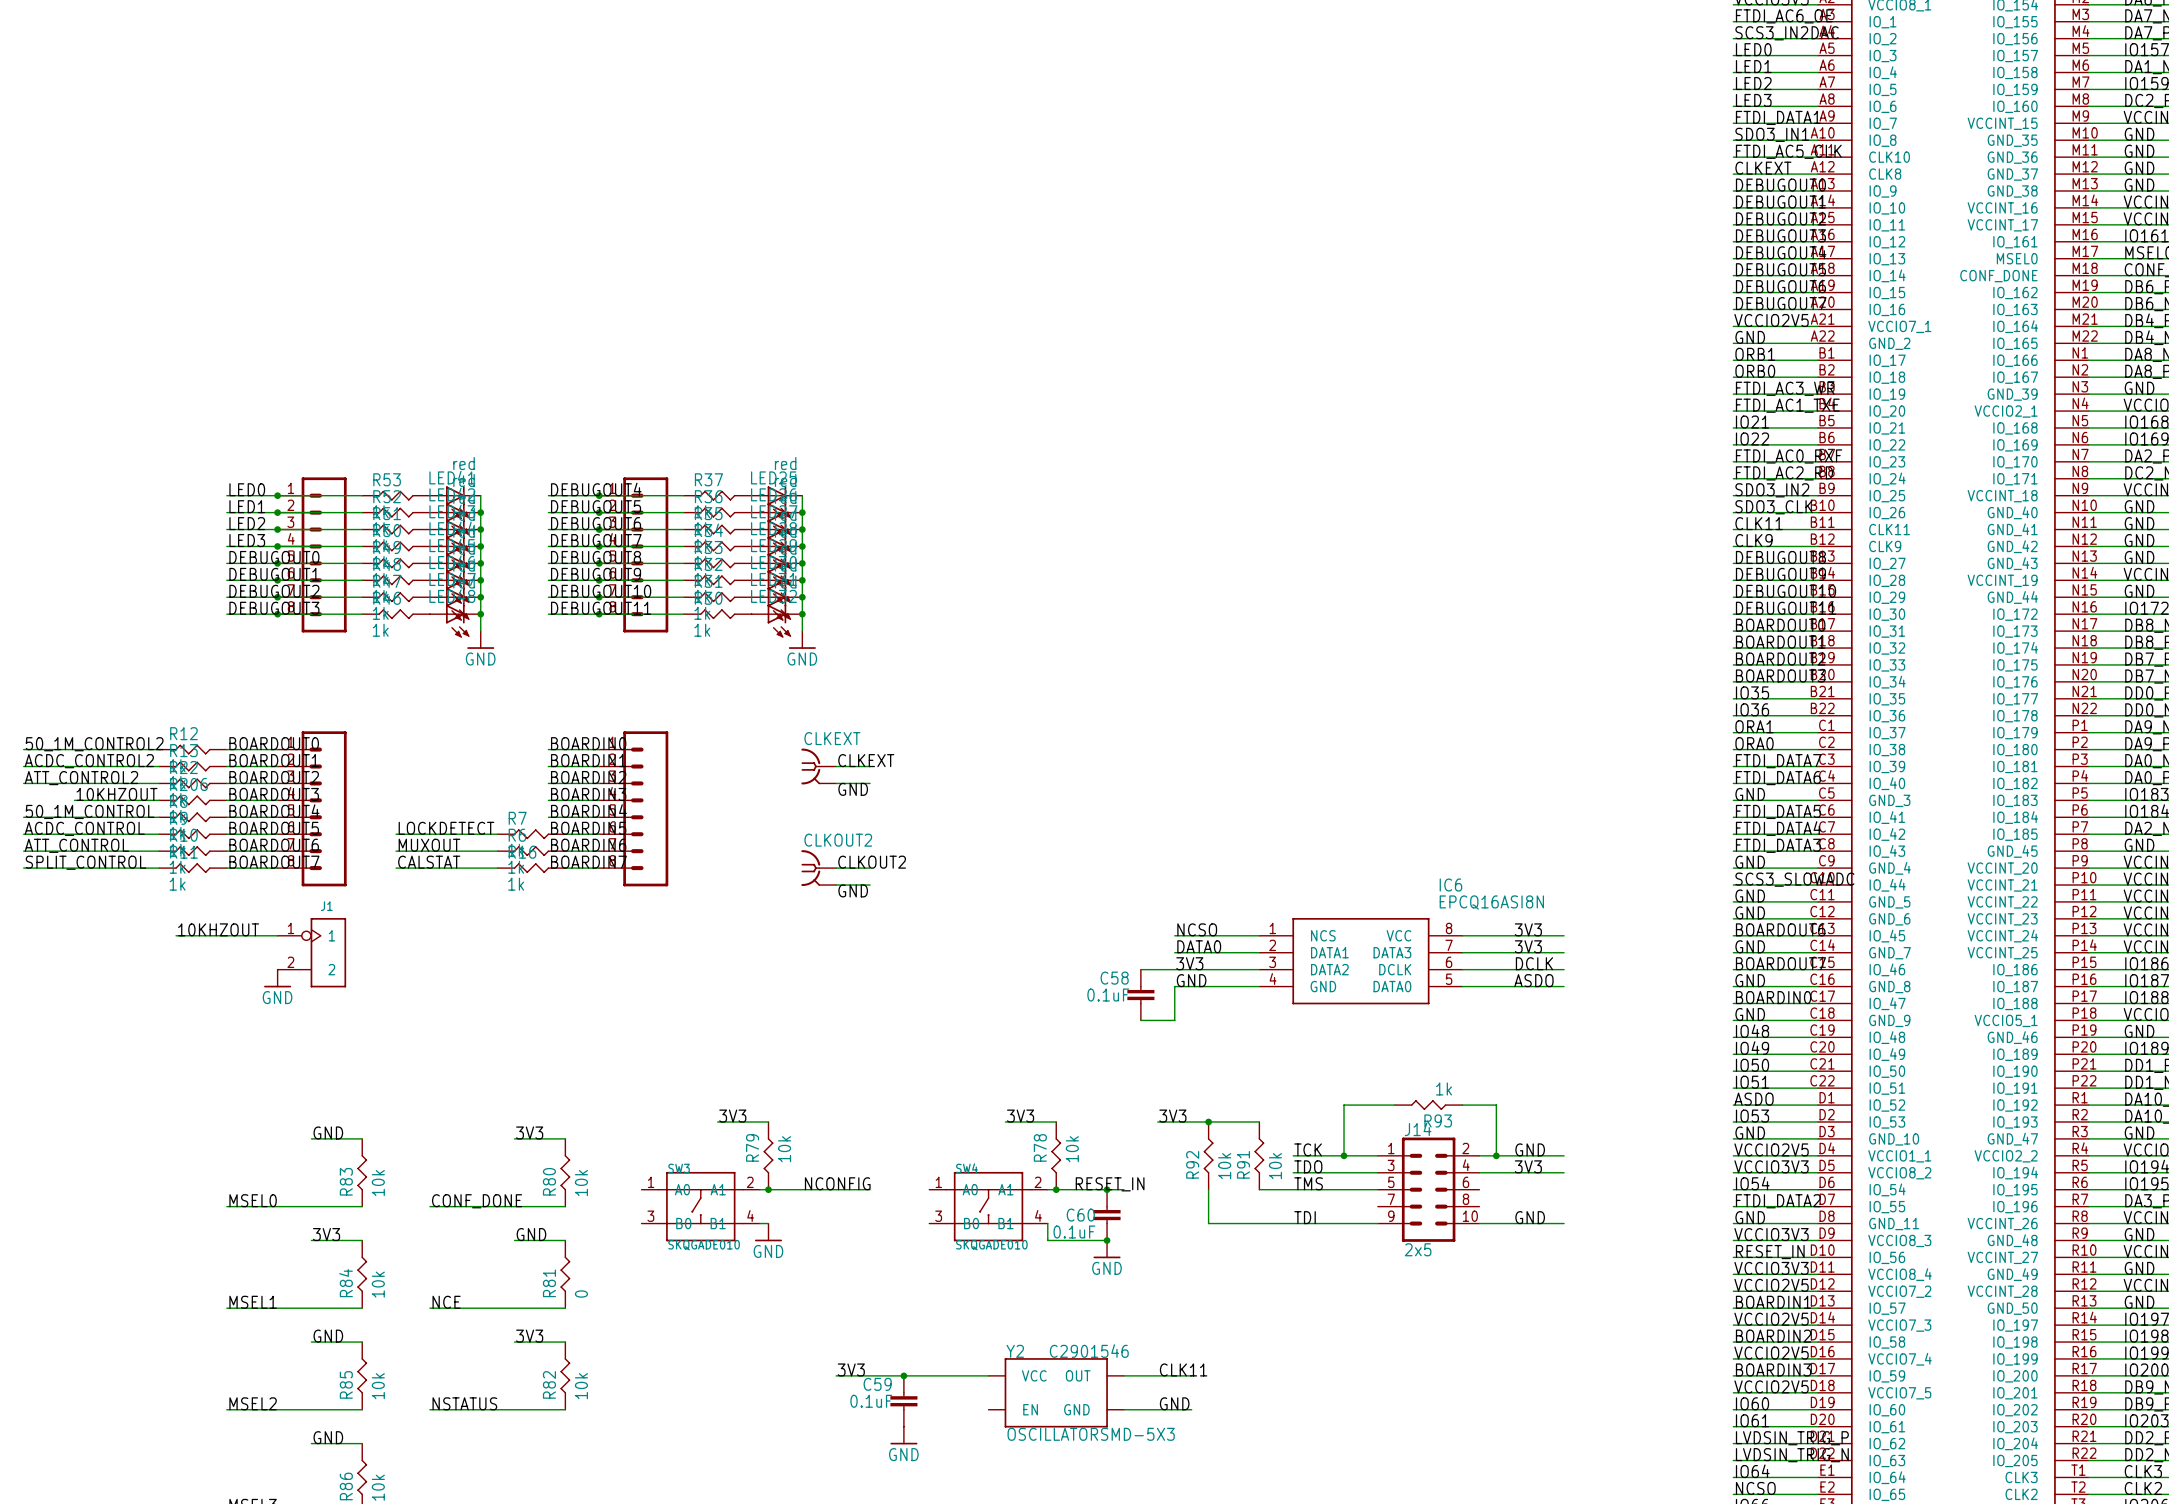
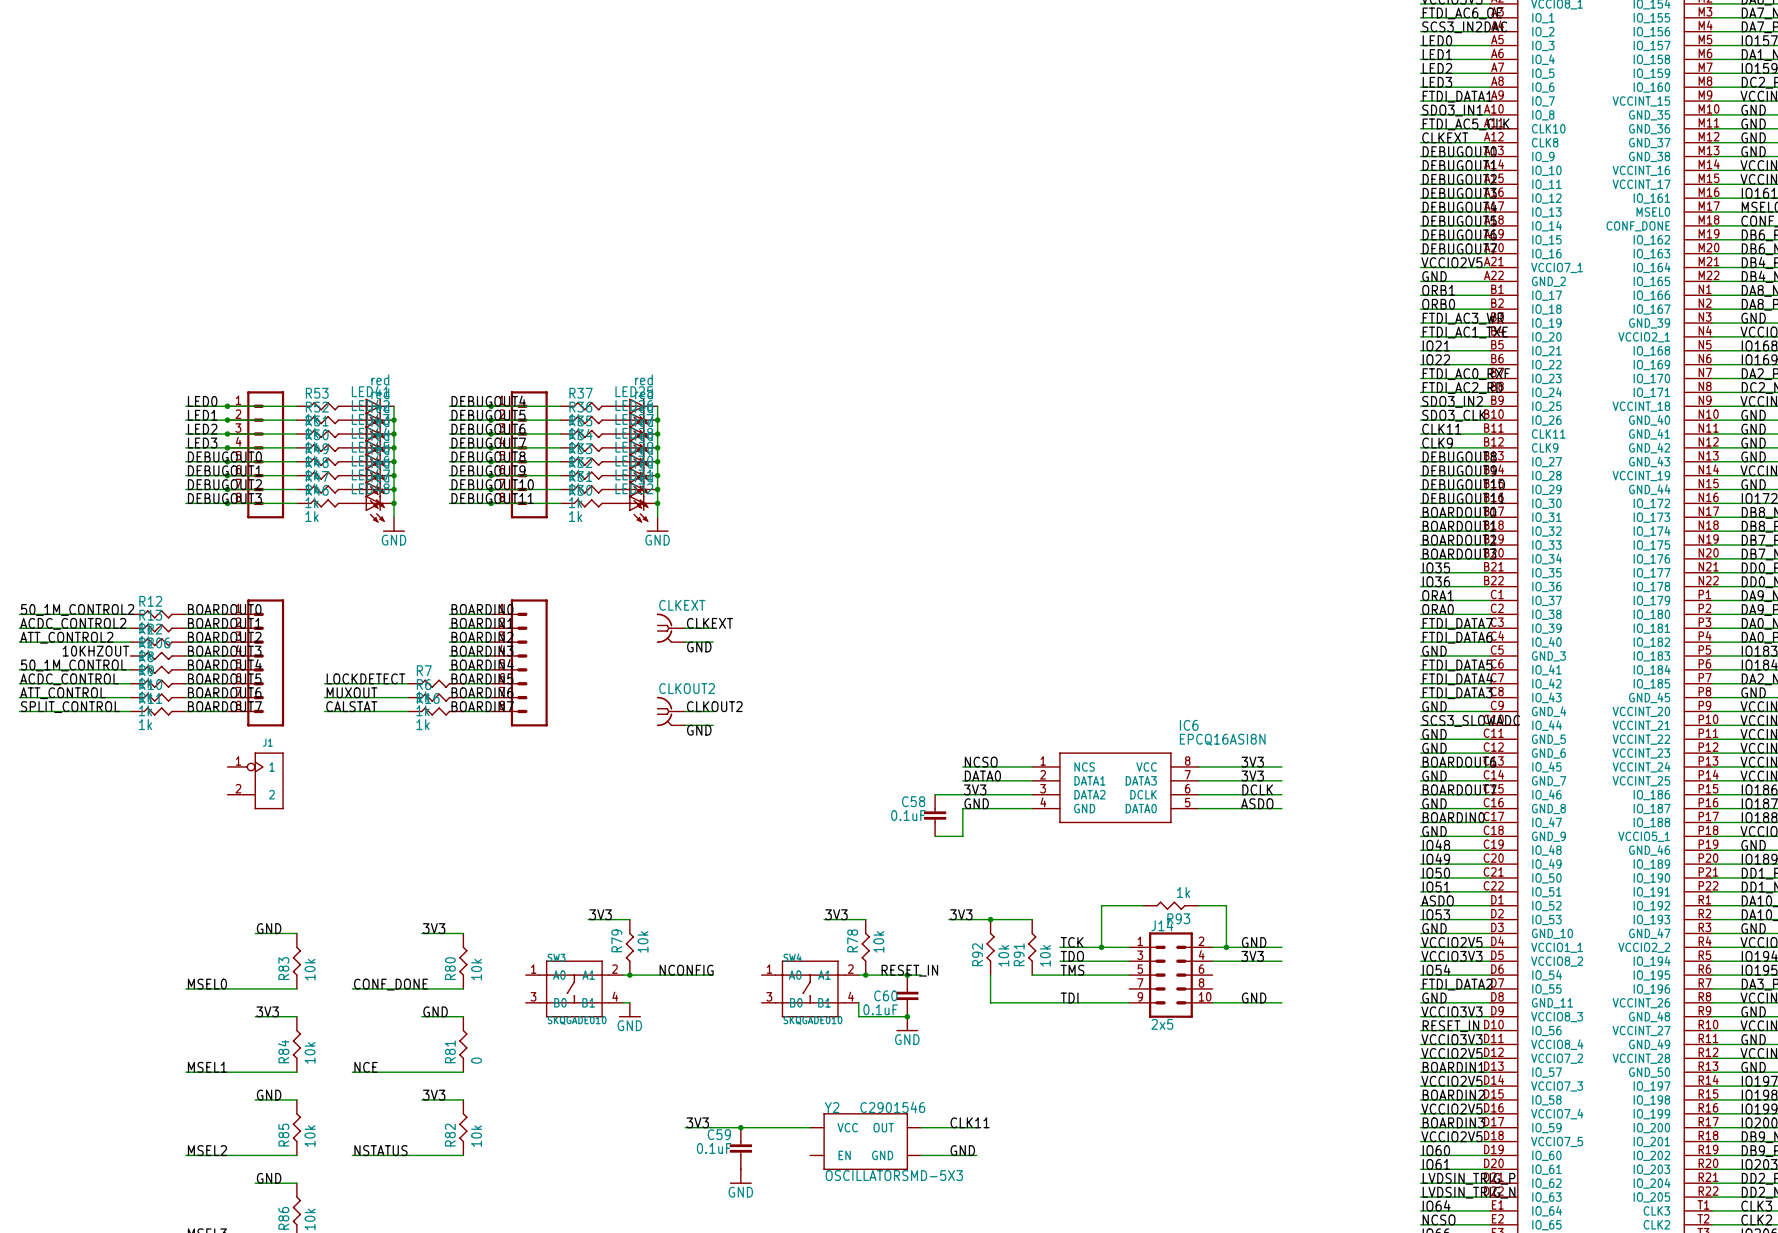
wire: (74, 800) (159, 800) -> none
label: 10KHZOUT (218, 929) -> none
wire: (176, 935) (277, 935) -> none
power symbol: GND (277, 978) -> none

